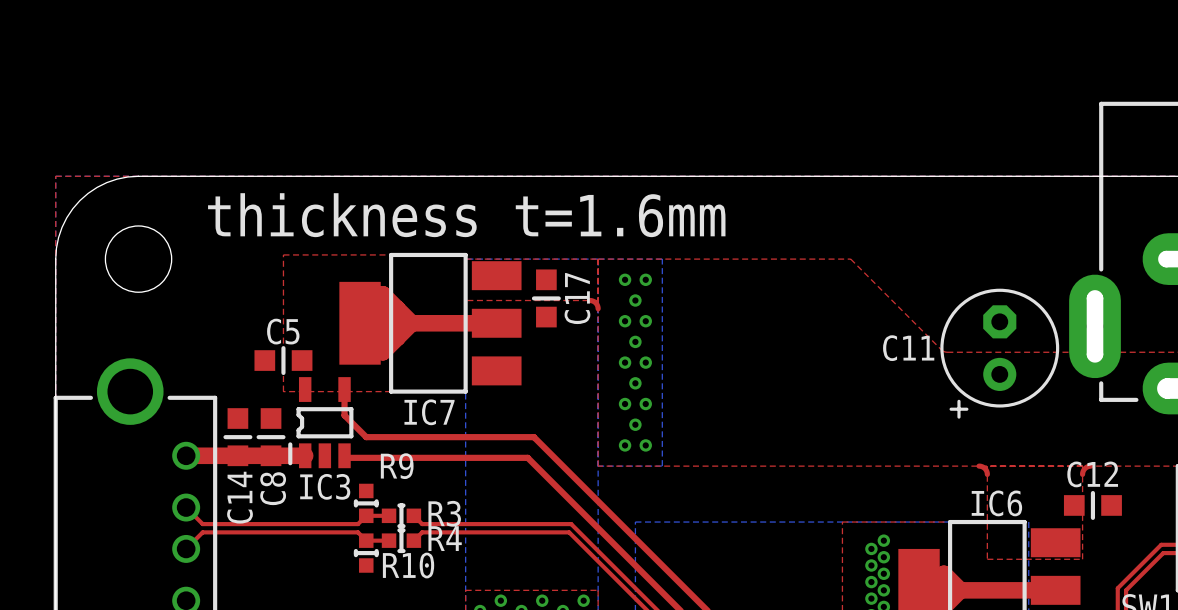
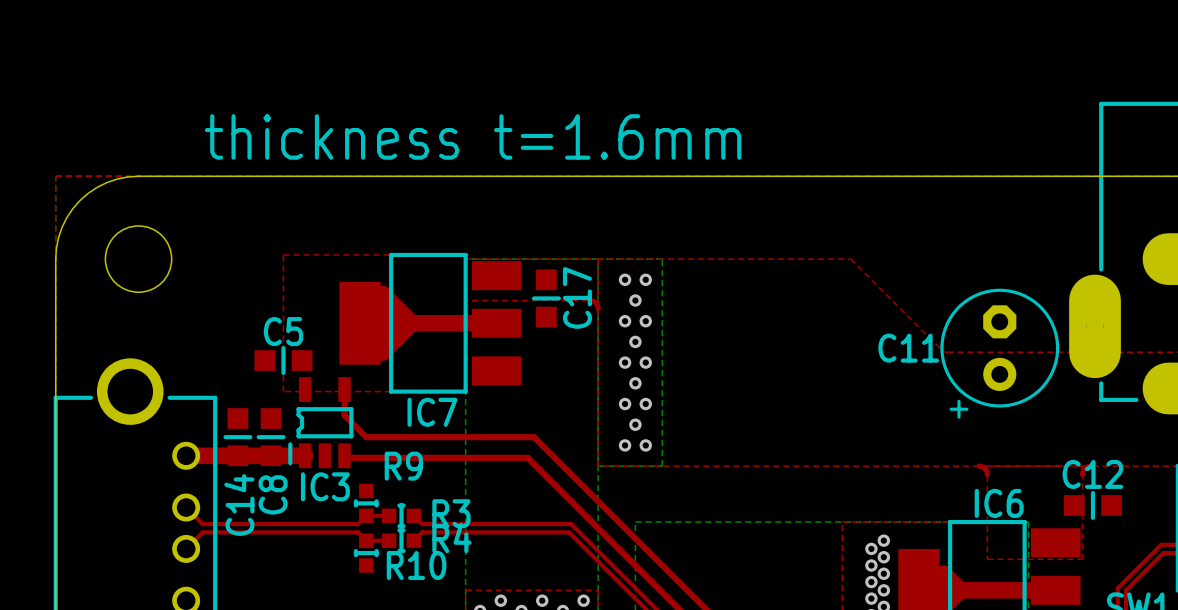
text position: thickness t=1.6mm (466, 215) -> thickness t=1.6mm (473, 136)

